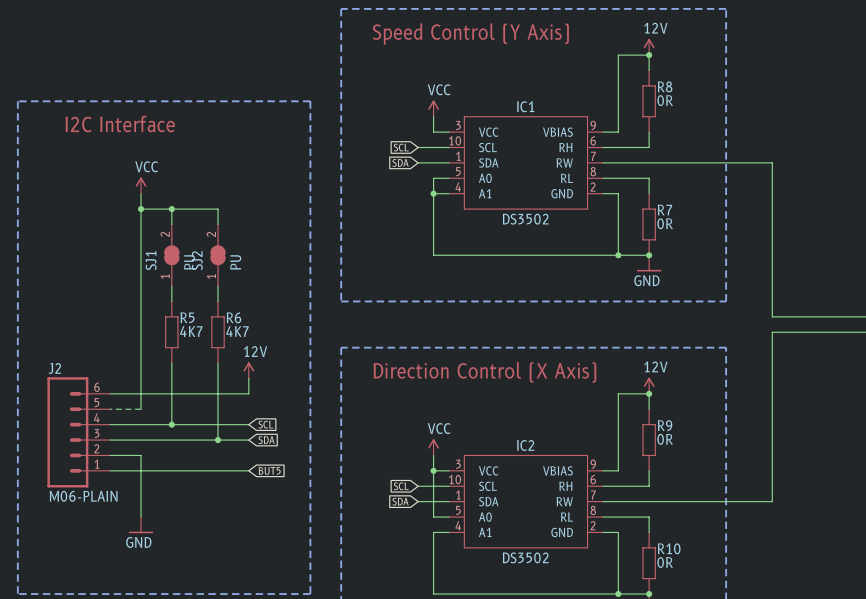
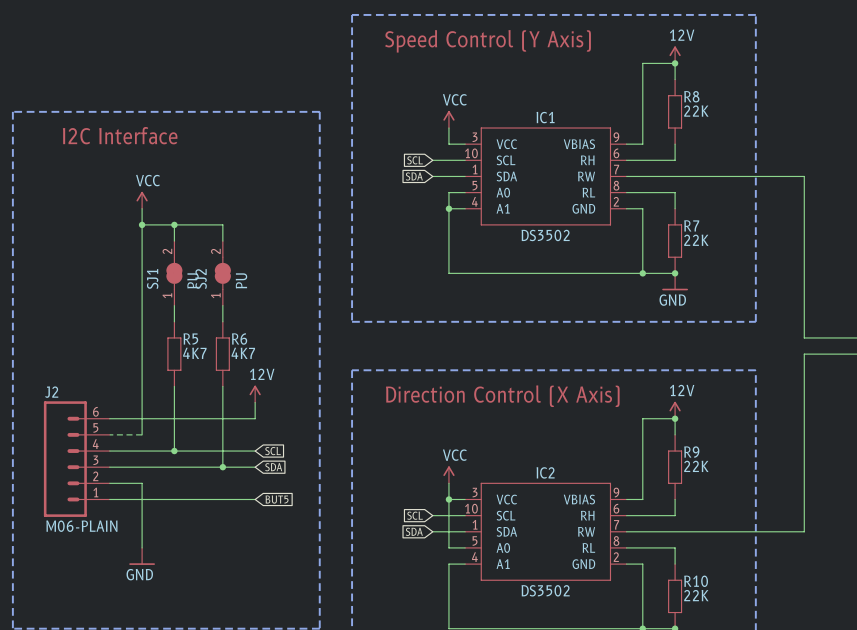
R8 value: 0R (665, 100) -> 22K (696, 111)
R7 value: 0R (665, 223) -> 22K (696, 240)
R9 value: 0R (665, 439) -> 22K (696, 466)
R10 value: 0R (665, 562) -> 22K (696, 595)

